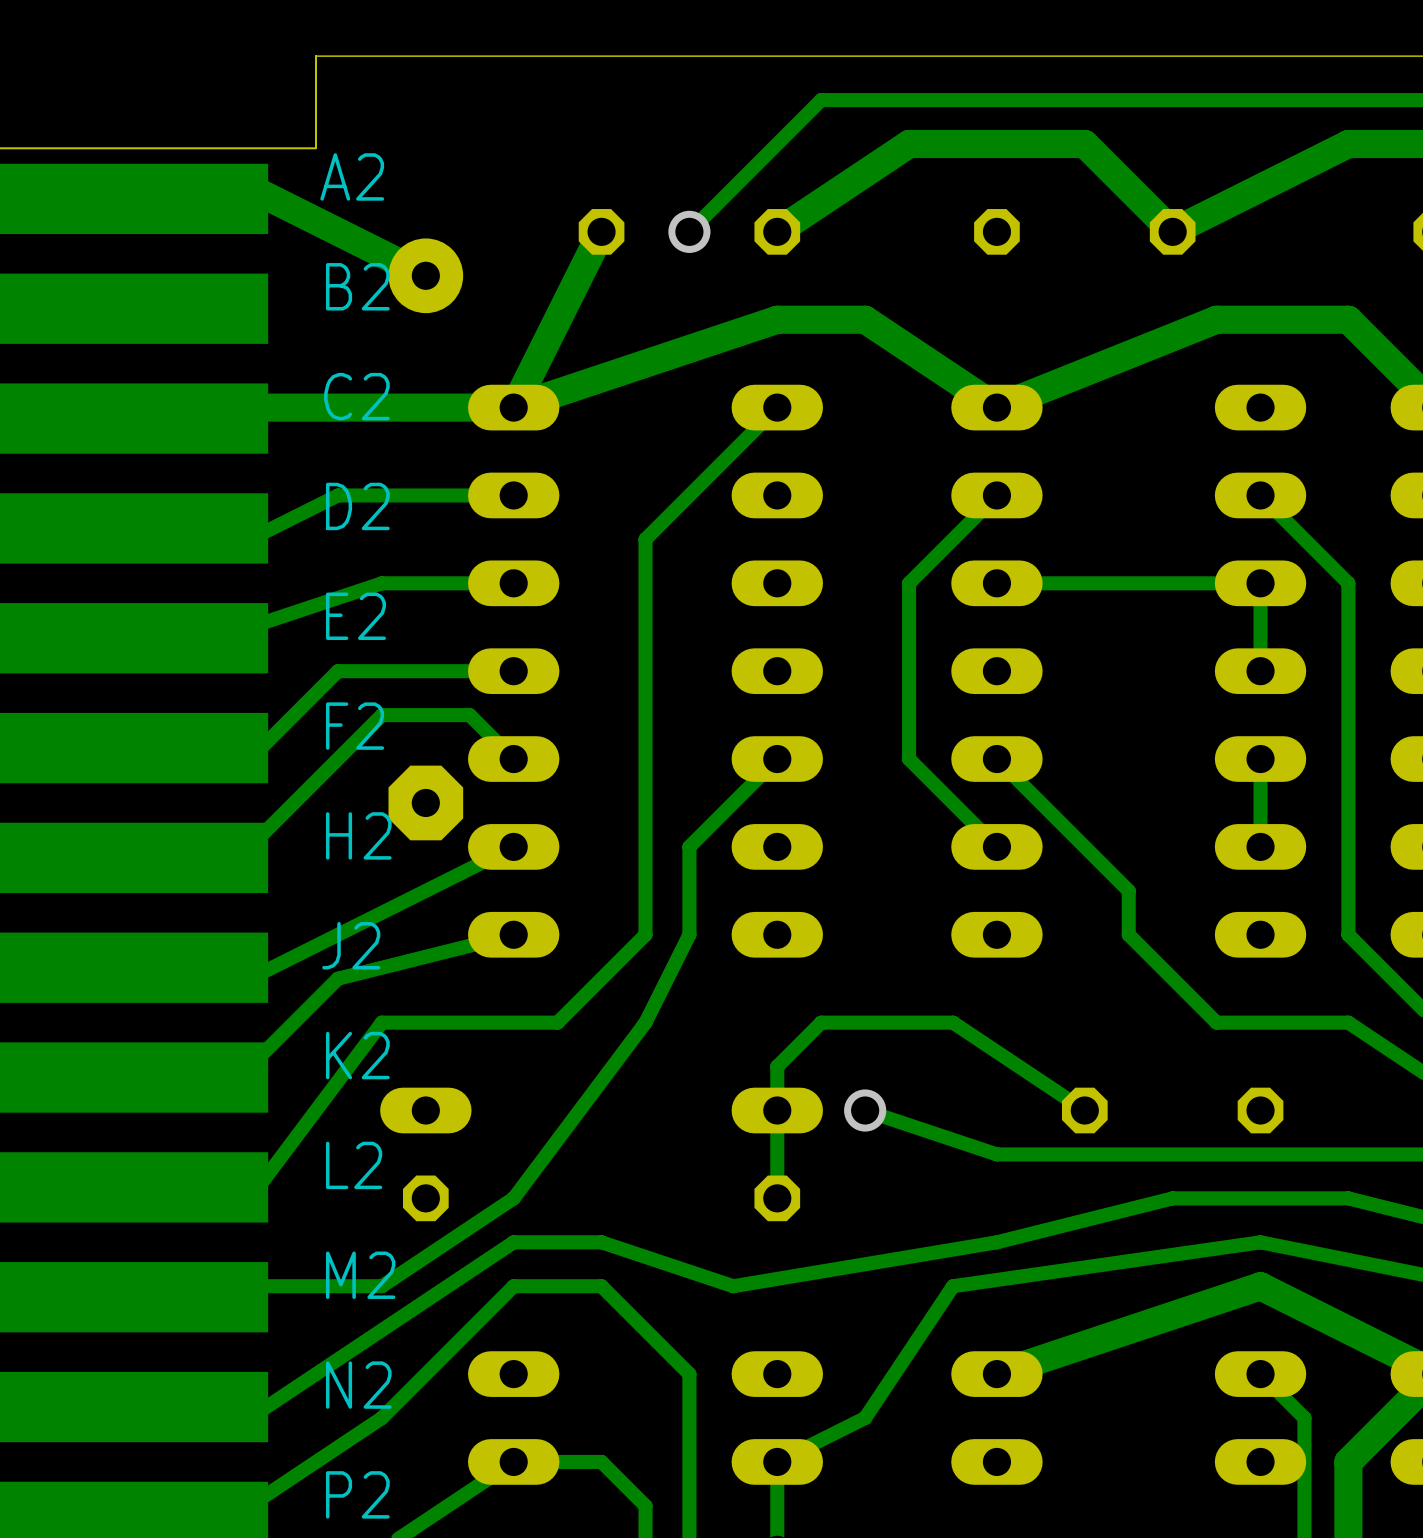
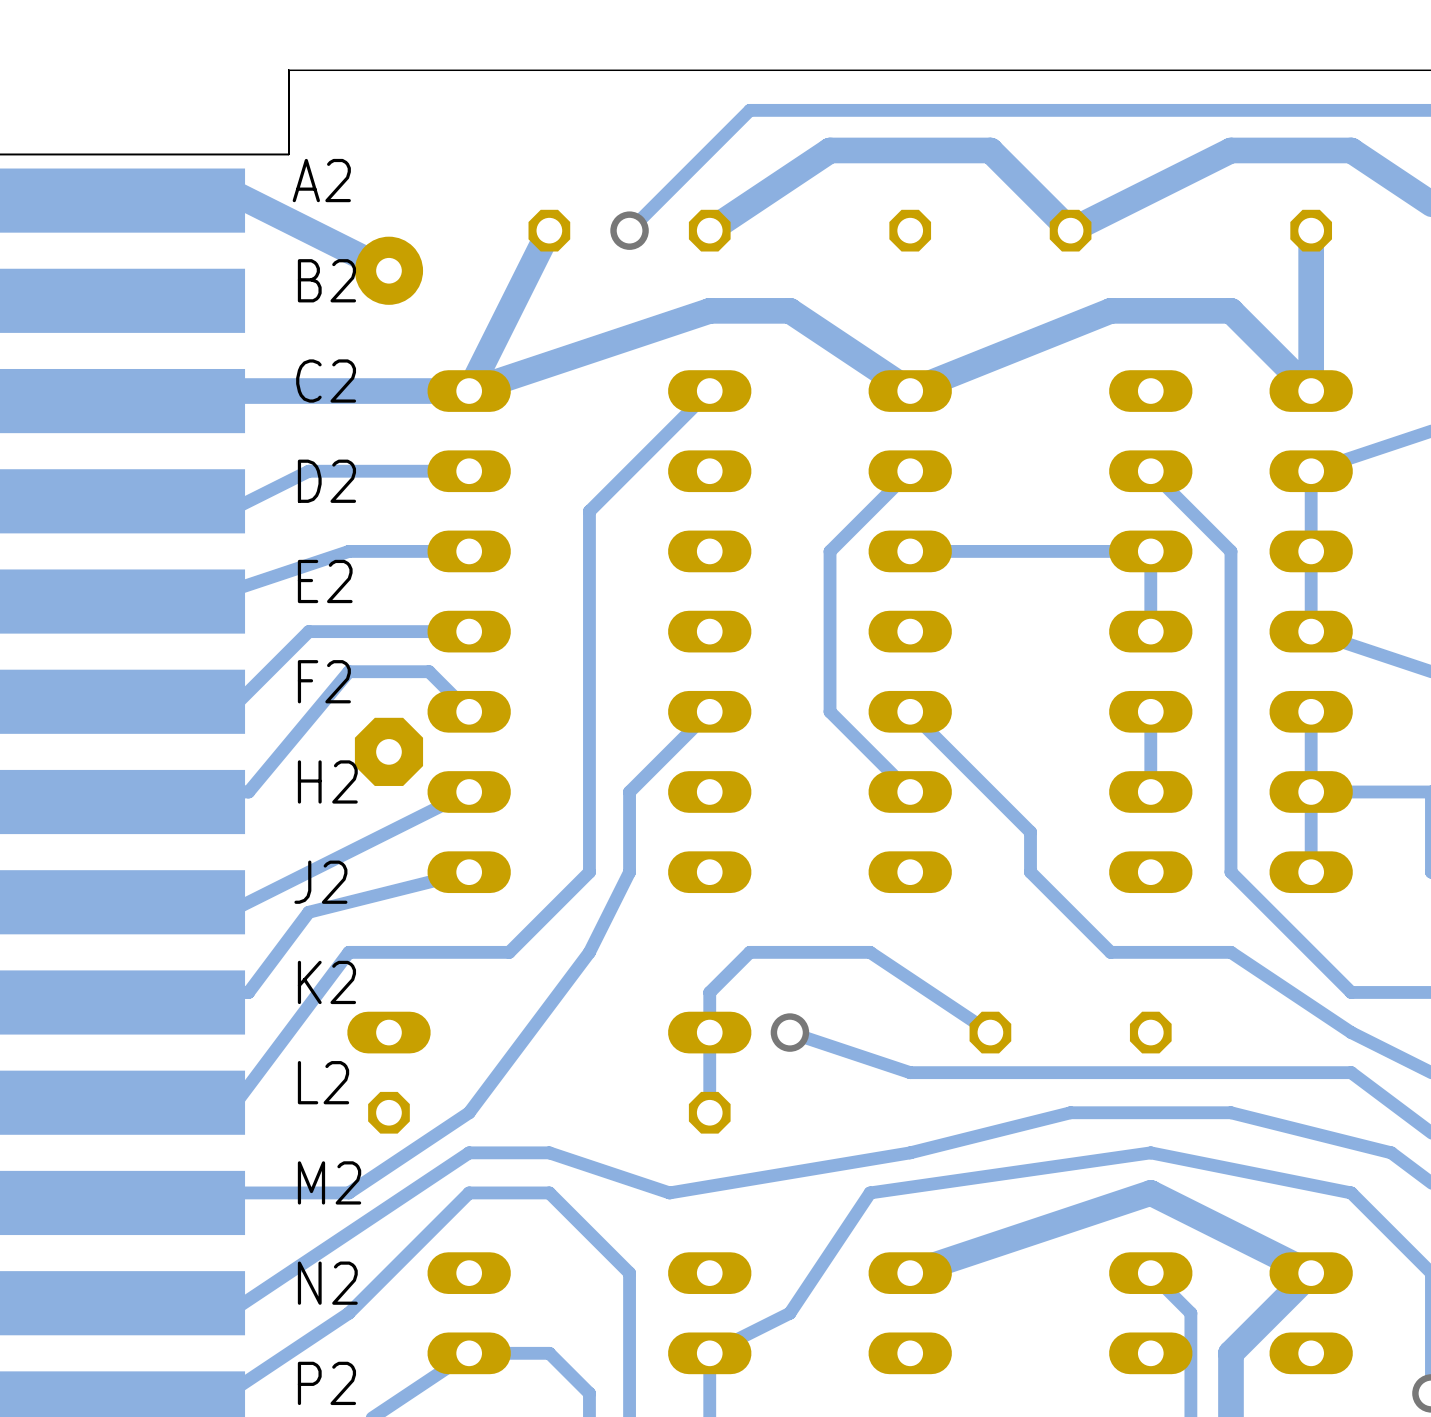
track: (381, 715) (250, 846) -> (348, 671) (248, 791) (228, 791)
track: (337, 978) (250, 1066) -> (308, 912) (248, 992) (228, 992)

